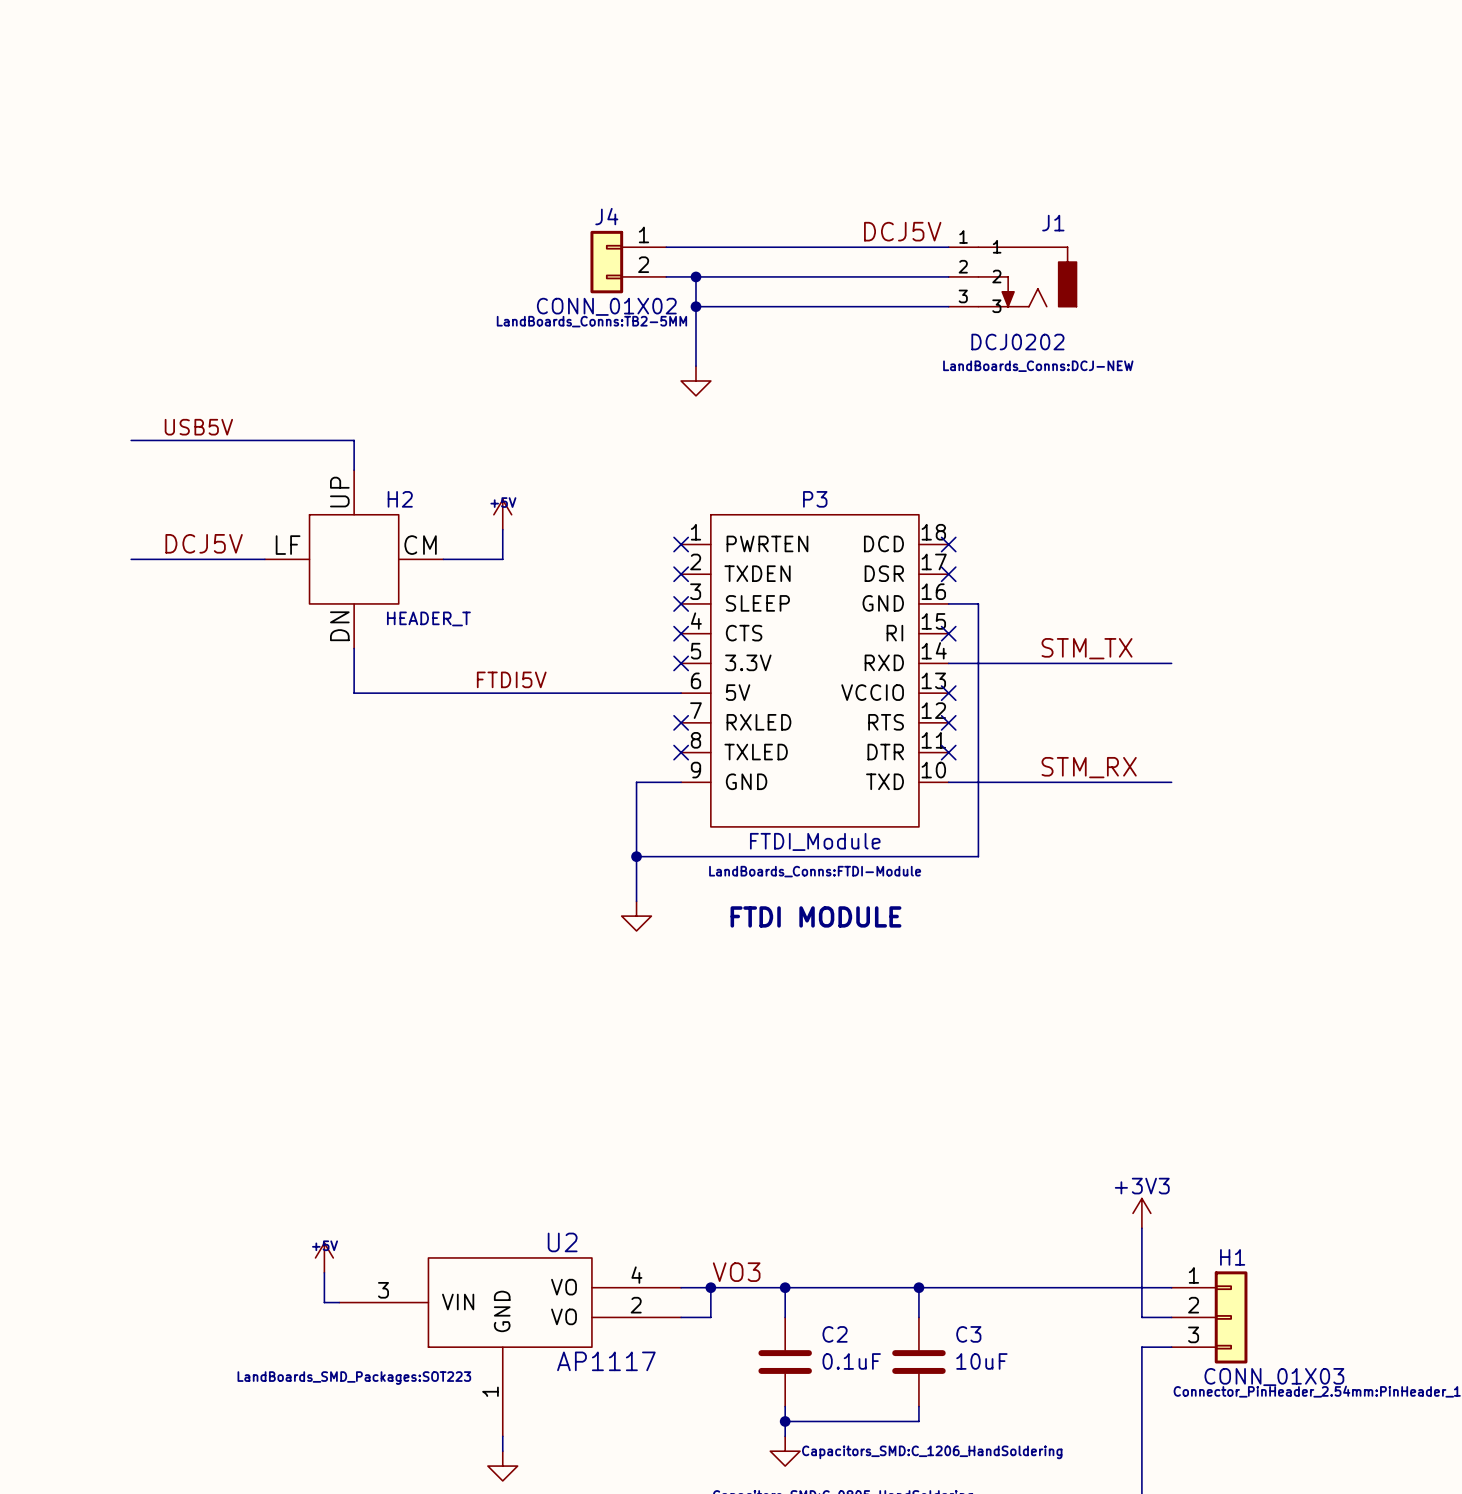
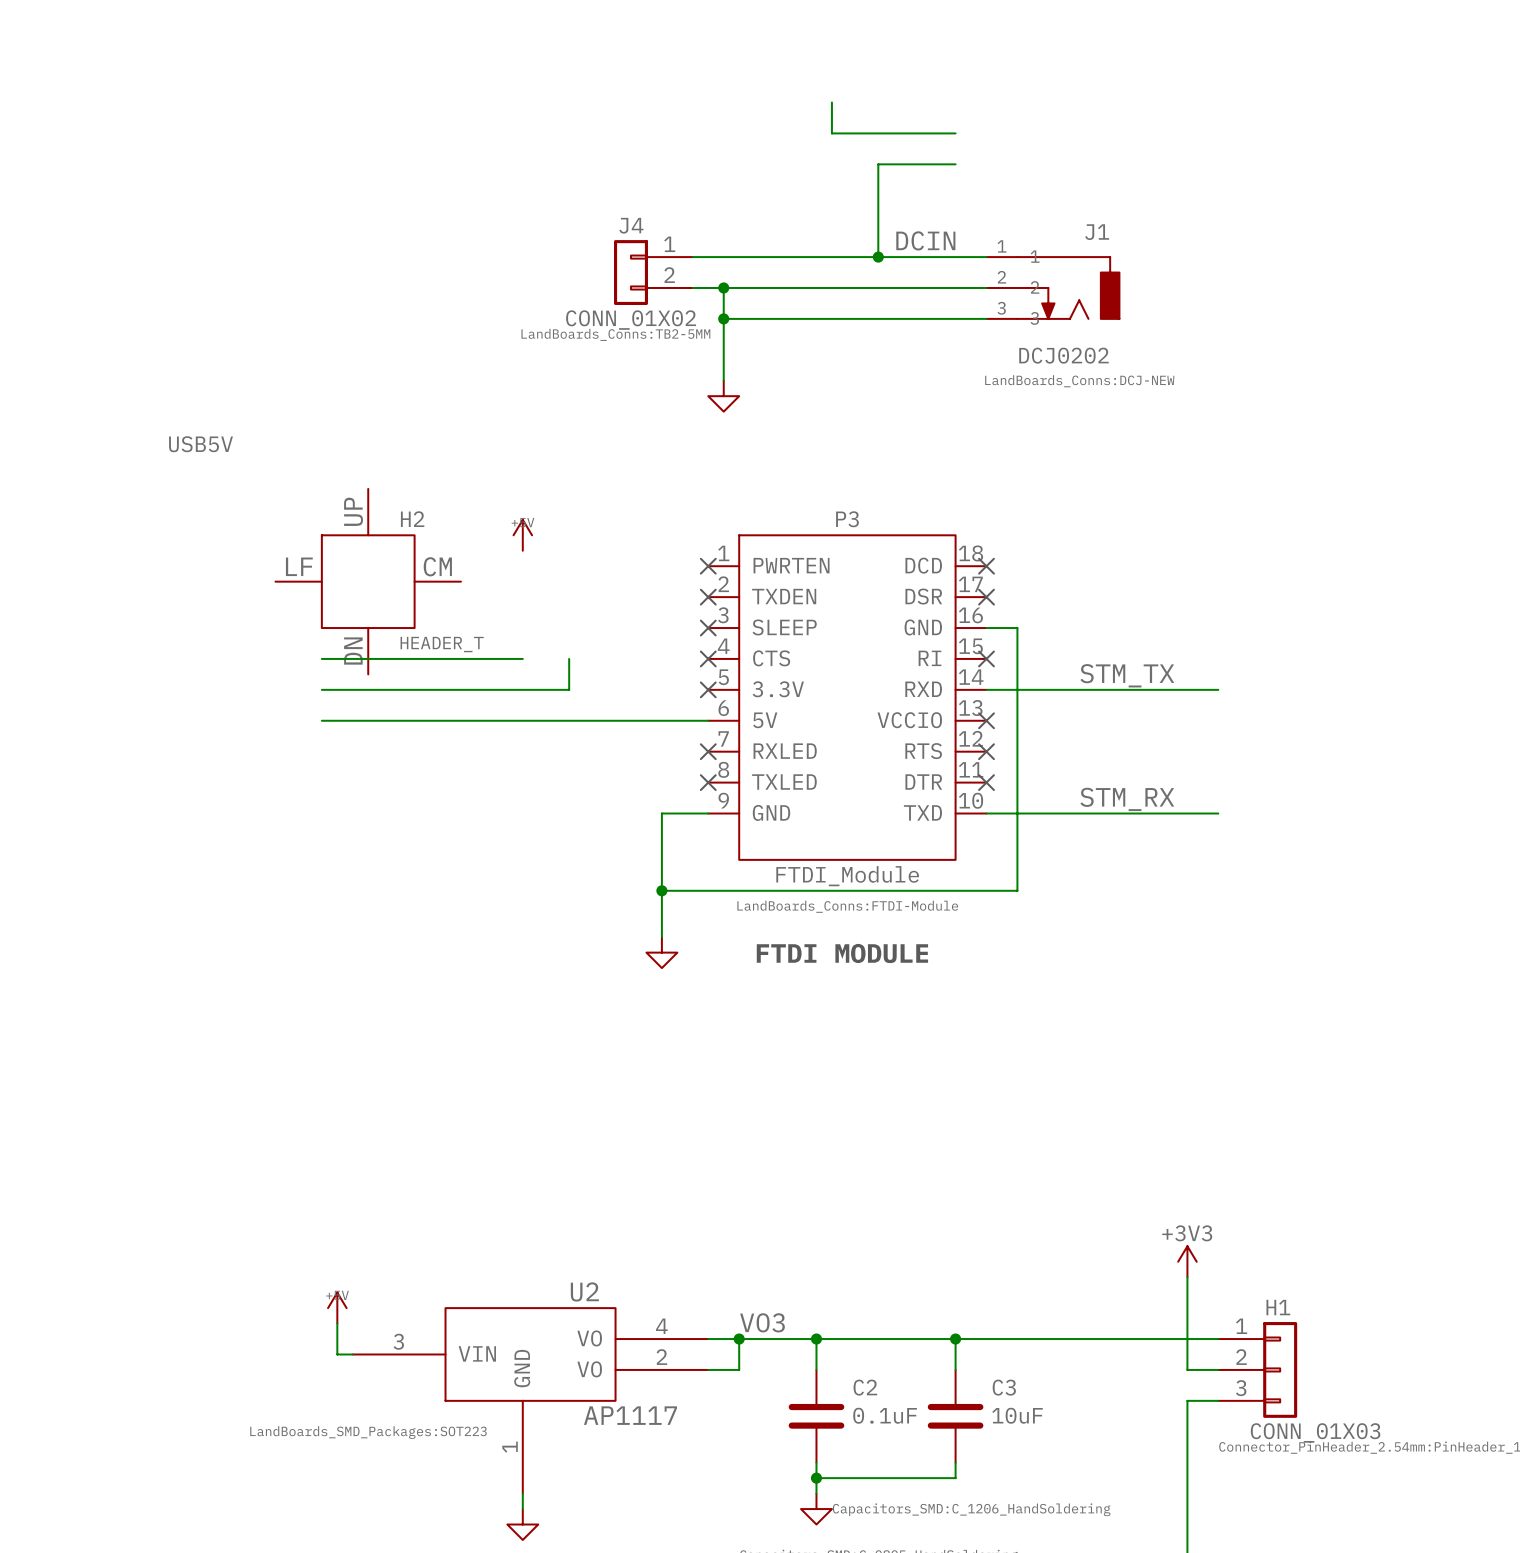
wire: none -> (831, 102) (831, 133) (955, 133)
wire: none -> (955, 164) (878, 164) (878, 257)
label: DCJ5V (902, 231) -> DCIN (925, 240)
junction: none -> (878, 257)
wire: (131, 440) (354, 440) (354, 470) -> none
wire: (502, 529) (502, 559) (443, 559) -> none
label: DCJ5V (204, 543) -> none
wire: (131, 559) (264, 559) -> none
wire: none -> (321, 658) (522, 658)
wire: none -> (569, 658) (569, 689) (321, 689)
wire: (354, 648) (354, 693) -> (321, 720) (368, 720)
label: FTDI5V (511, 679) -> none

